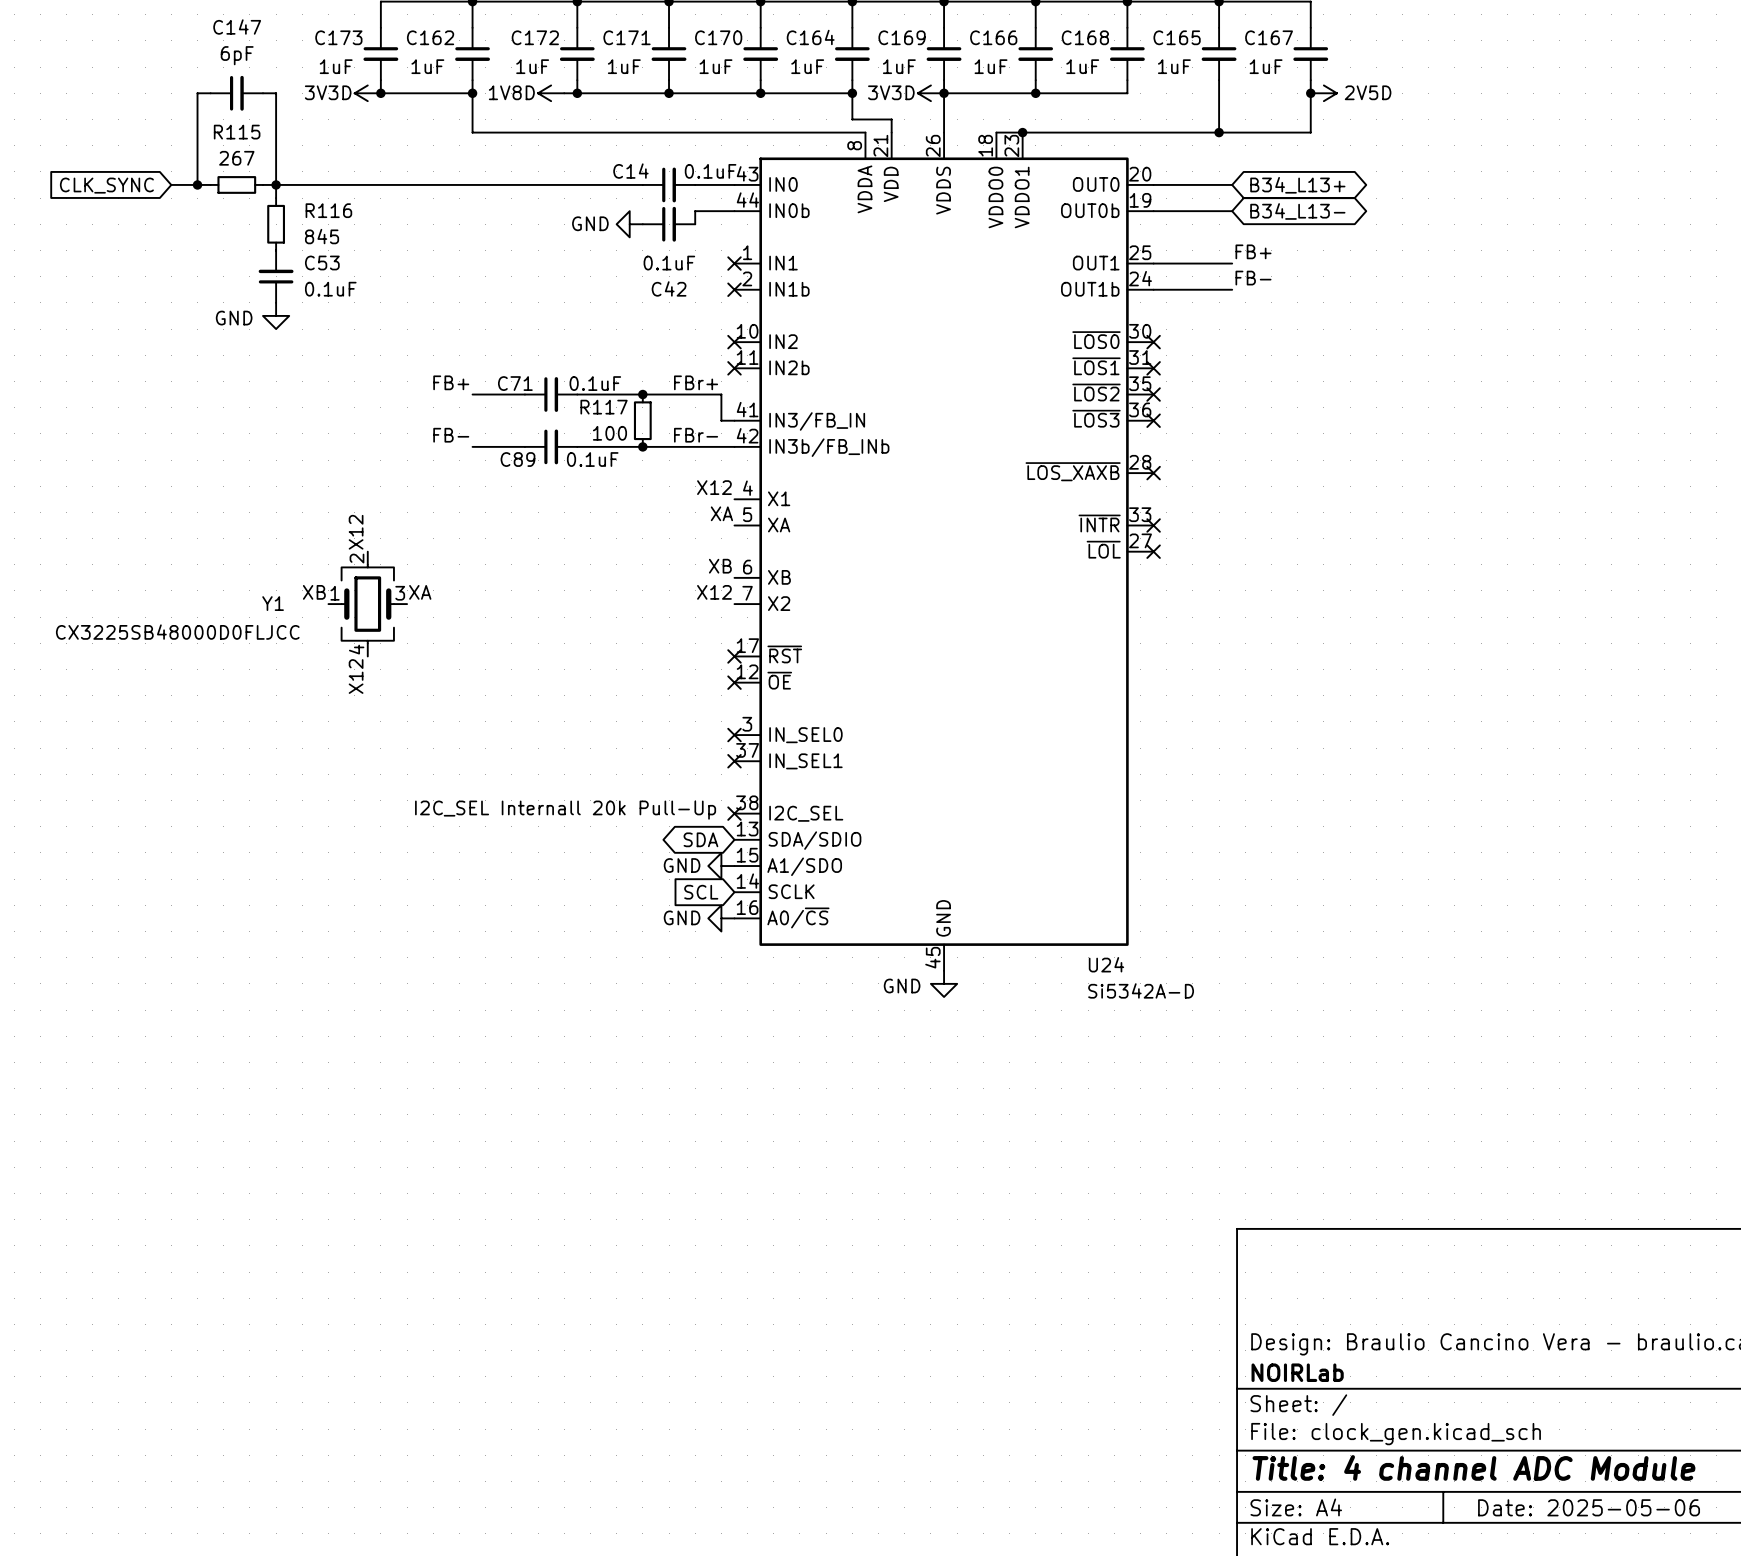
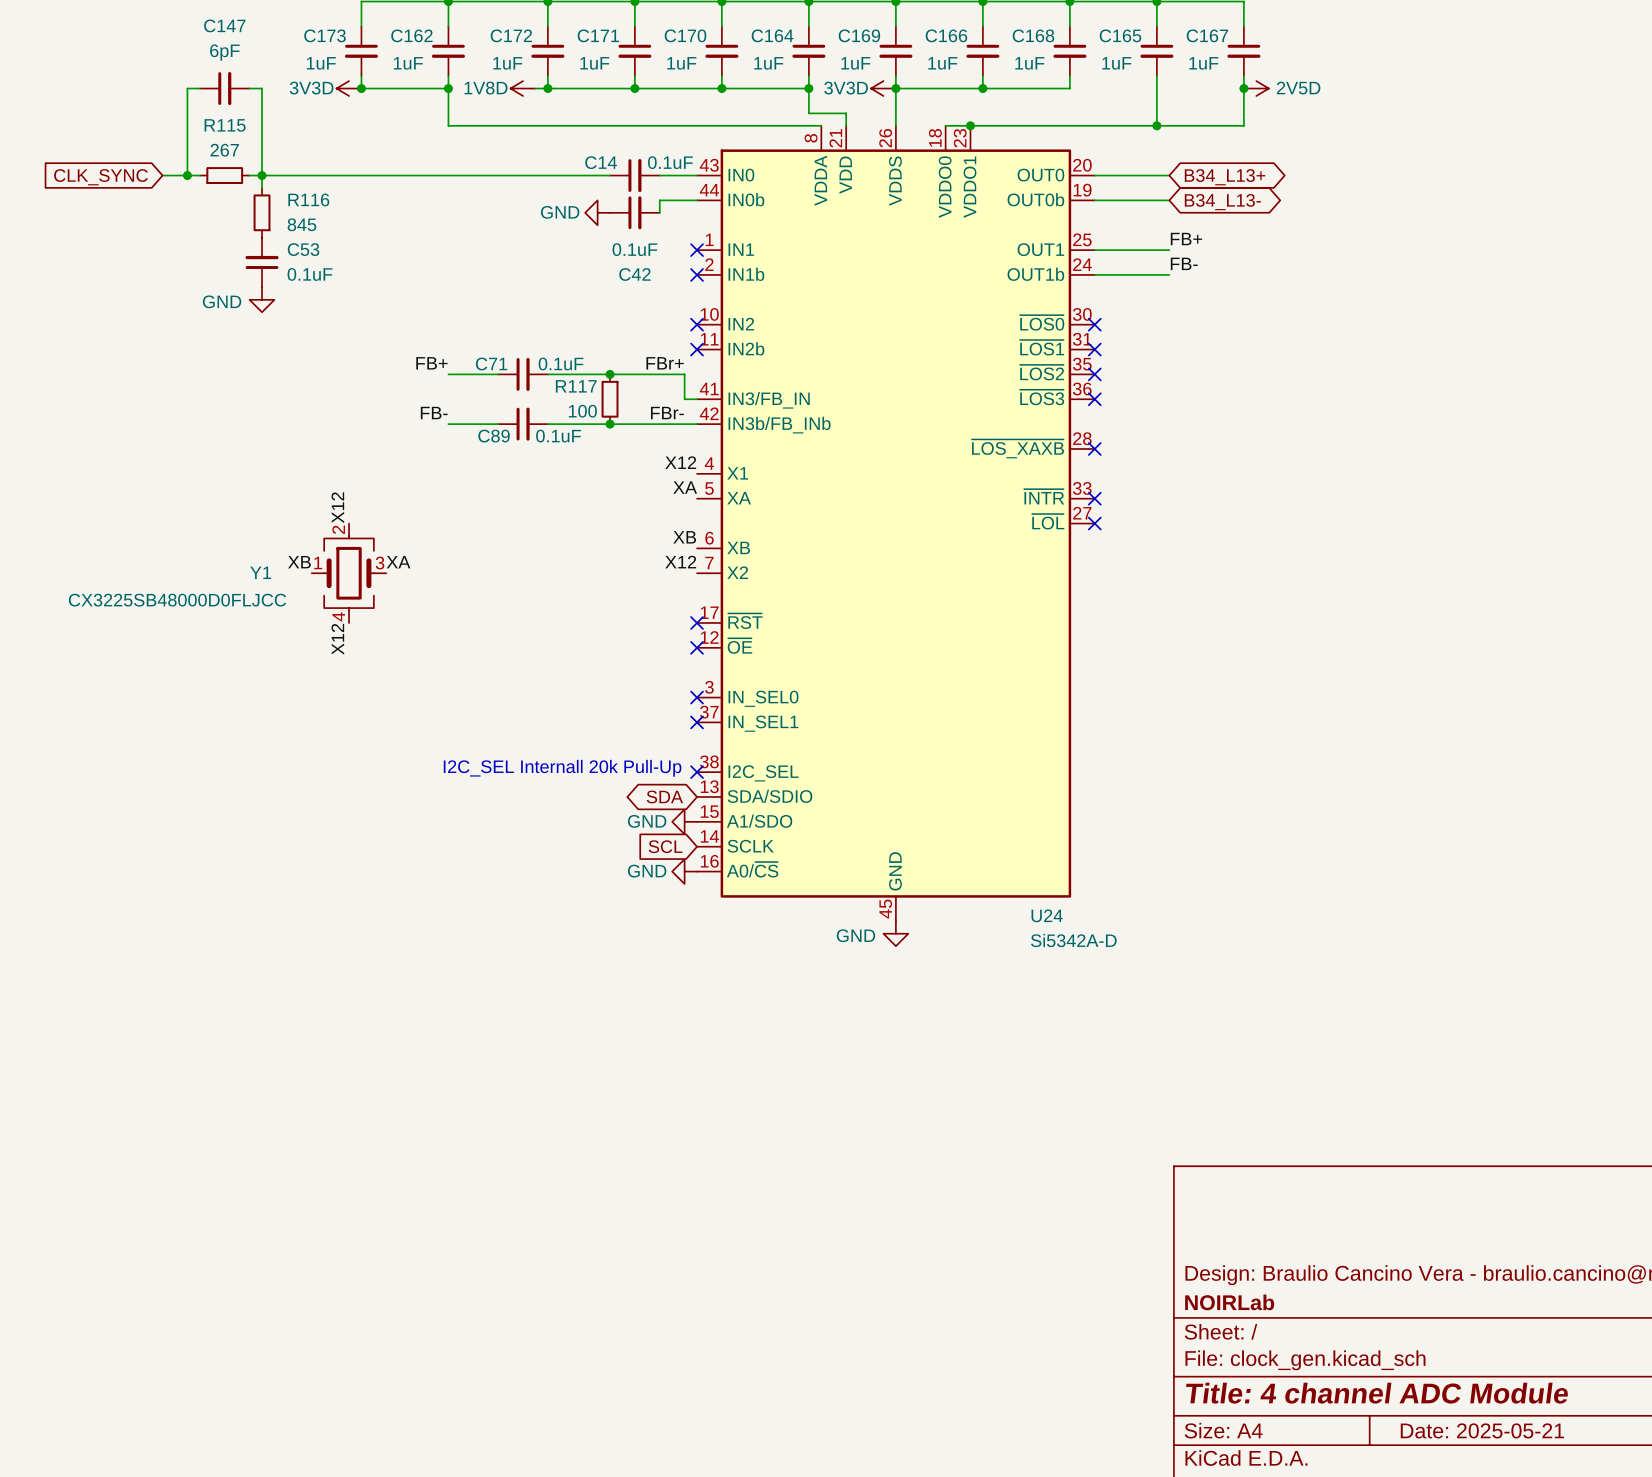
title block: Date: 2025-05-06 (1589, 1507) -> Date: 2025-05-21 (1482, 1430)

